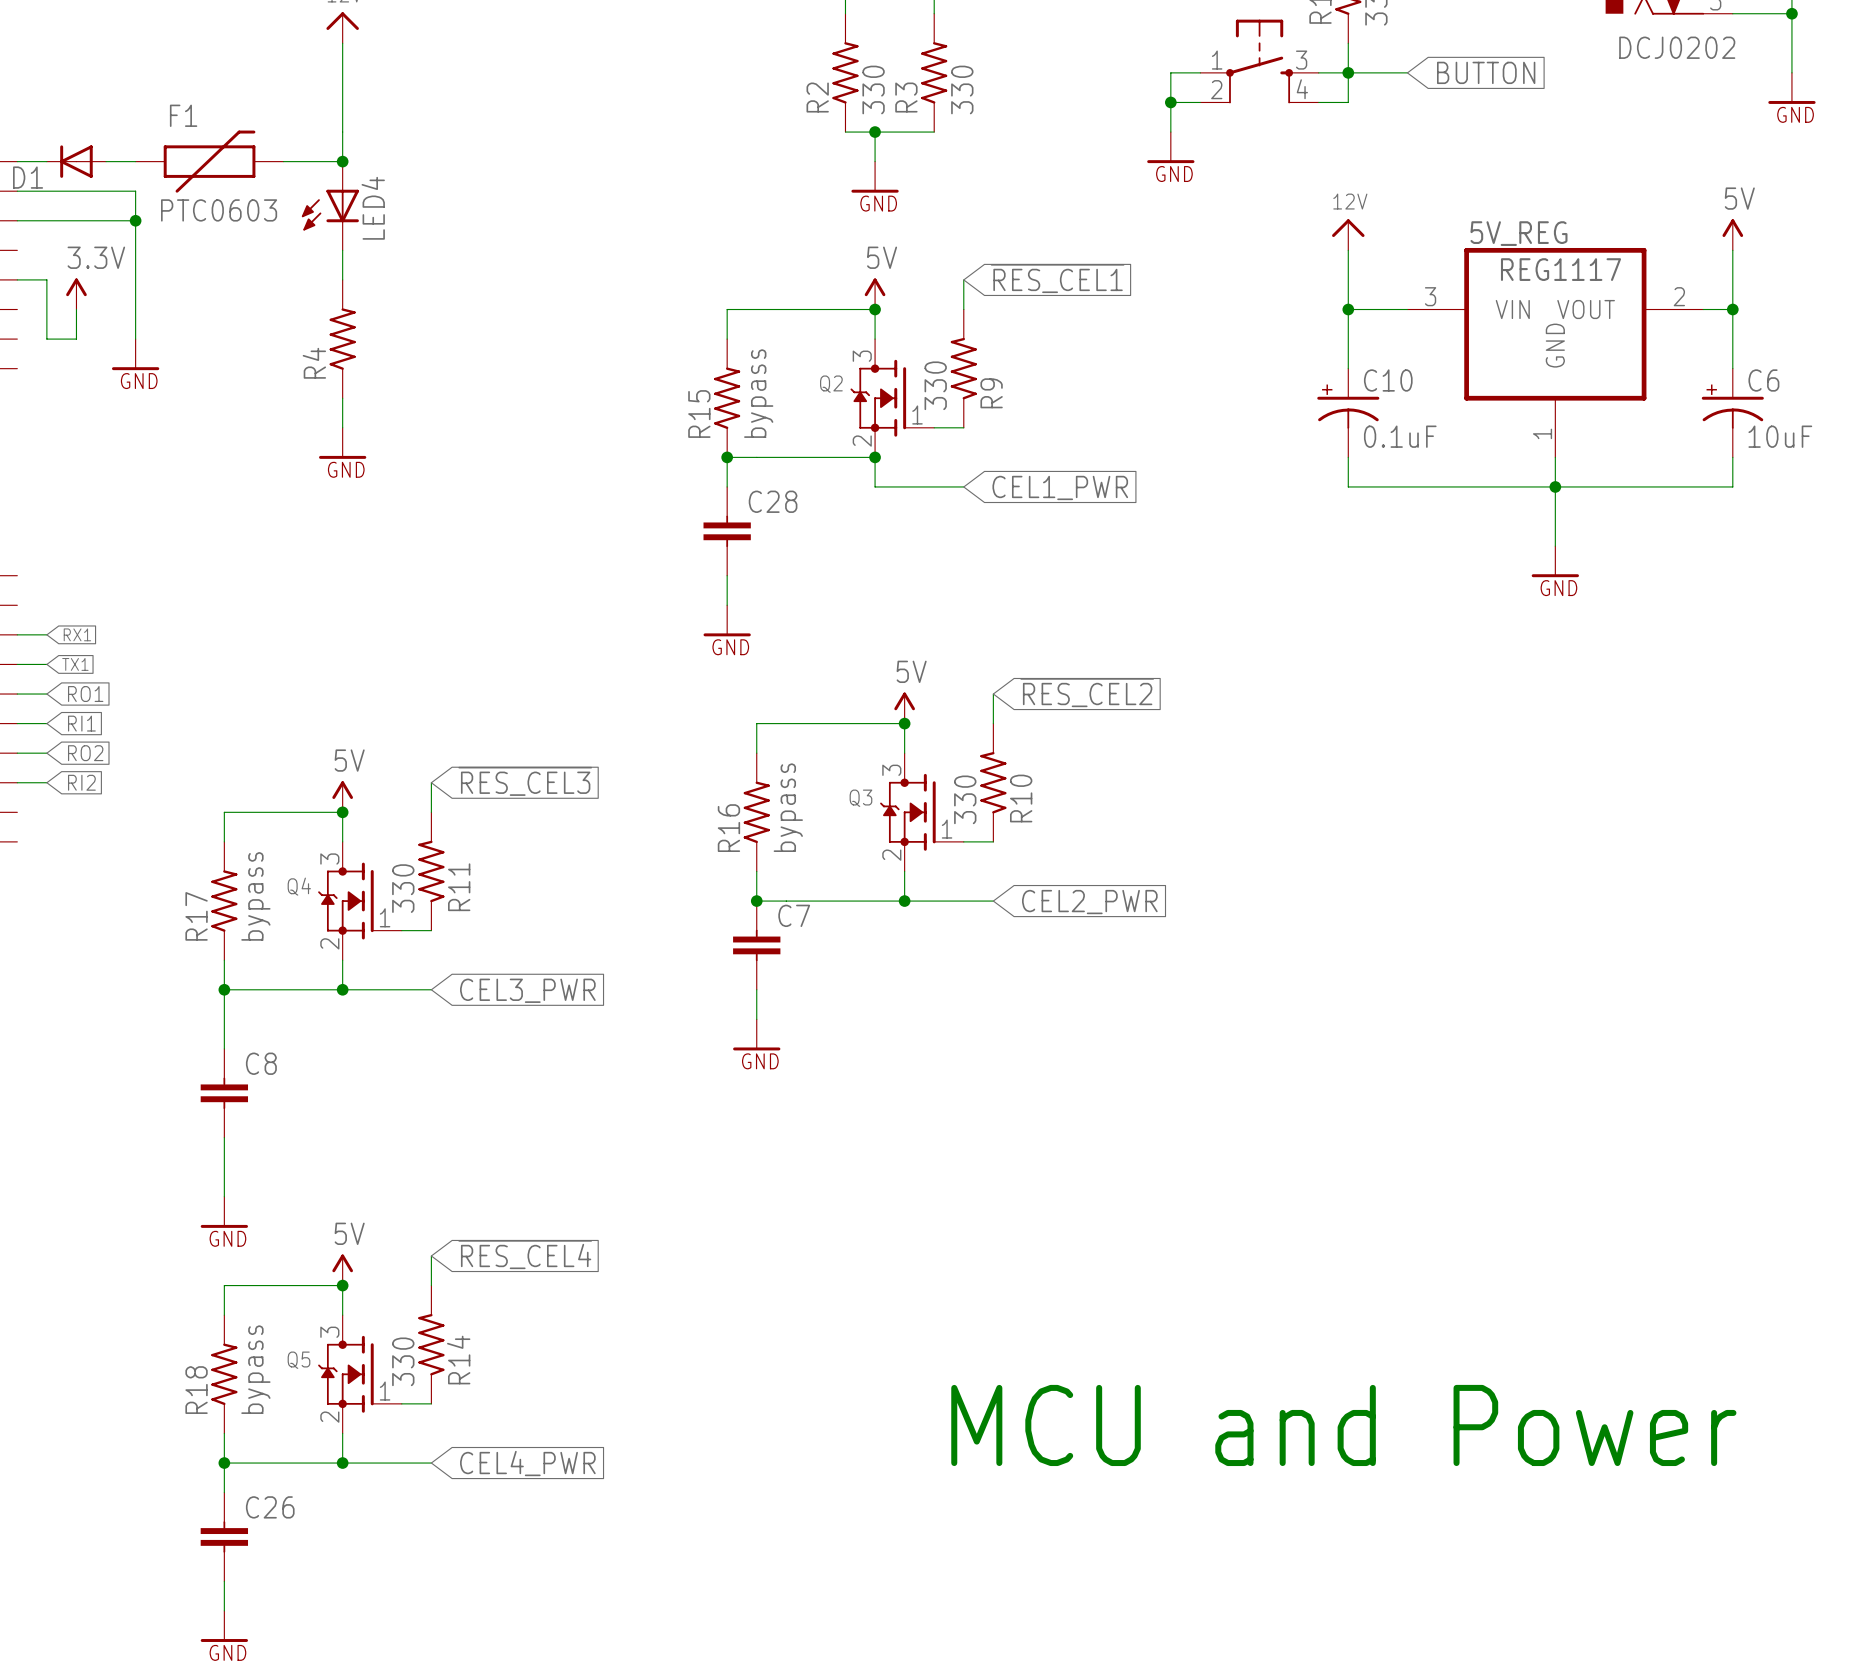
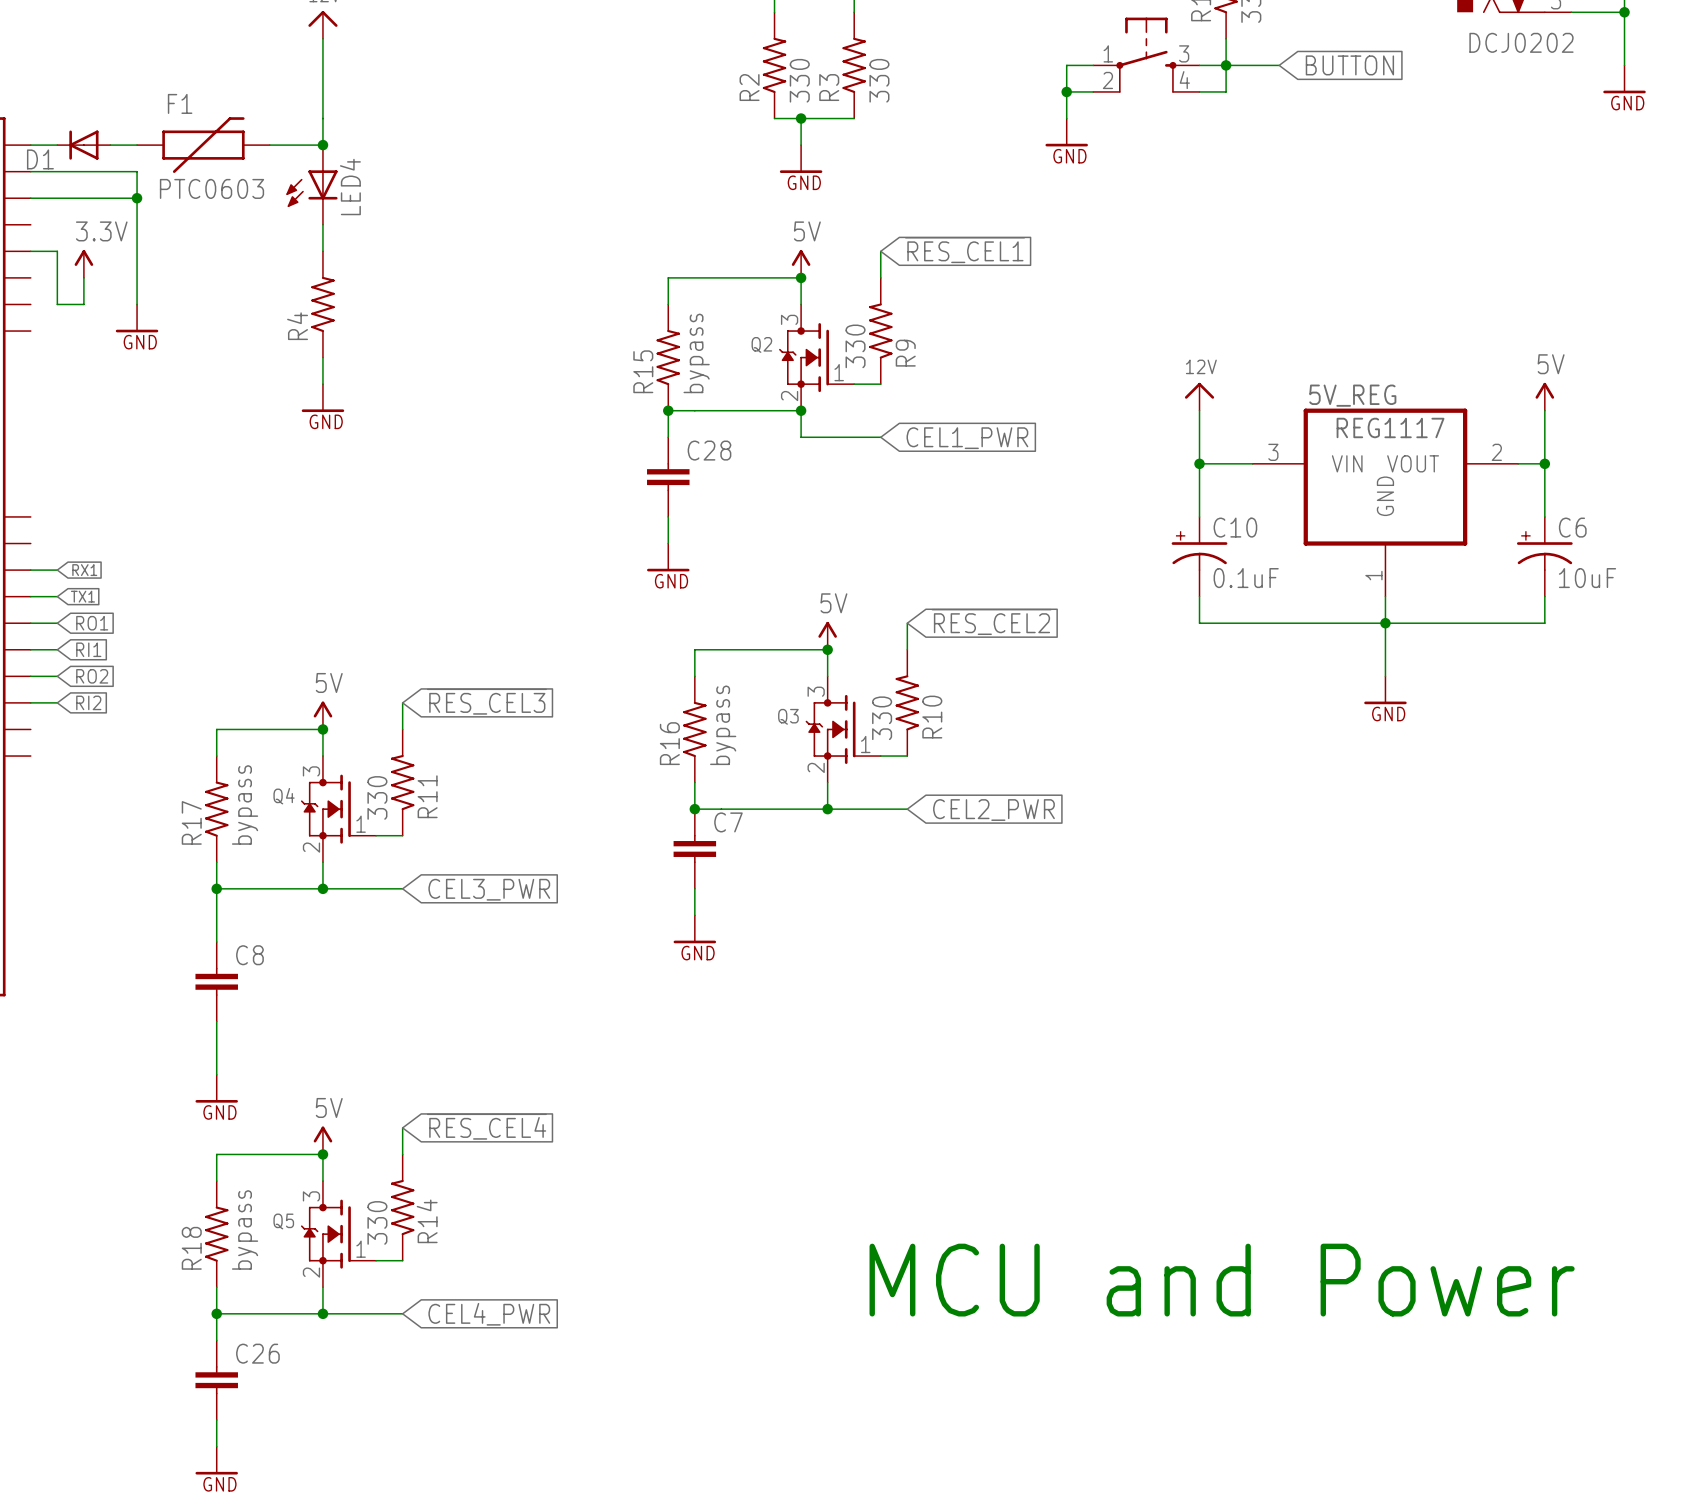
power symbol position: 12V (1348, 234) -> 12V (1199, 396)
power symbol position: 5V (1732, 234) -> 5V (1544, 396)
wire: (1348, 250) (1348, 368) -> (1199, 410) (1199, 516)
wire: (1732, 250) (1732, 368) -> (1544, 410) (1544, 516)
wire: (1348, 309) (1407, 309) -> (1199, 463) (1252, 463)
junction: (1348, 309) -> none
wire: (1703, 309) (1732, 309) -> (1518, 463) (1544, 463)
junction: (1732, 309) -> none
5V_REG position: (1555, 352) -> (1385, 502)
C10 position: (1348, 413) -> (1199, 556)
C6 position: (1732, 413) -> (1544, 556)
wire: (1348, 457) (1348, 486) (1732, 486) (1732, 457) -> (1199, 596) (1199, 623) (1544, 623) (1544, 596)
wire: (1555, 457) (1555, 546) -> (1385, 596) (1385, 676)
junction: (1555, 486) -> none
junction: none -> (1199, 463)
junction: none -> (1544, 463)
power symbol position: (1555, 561) -> (1385, 690)
junction: none -> (1385, 623)

